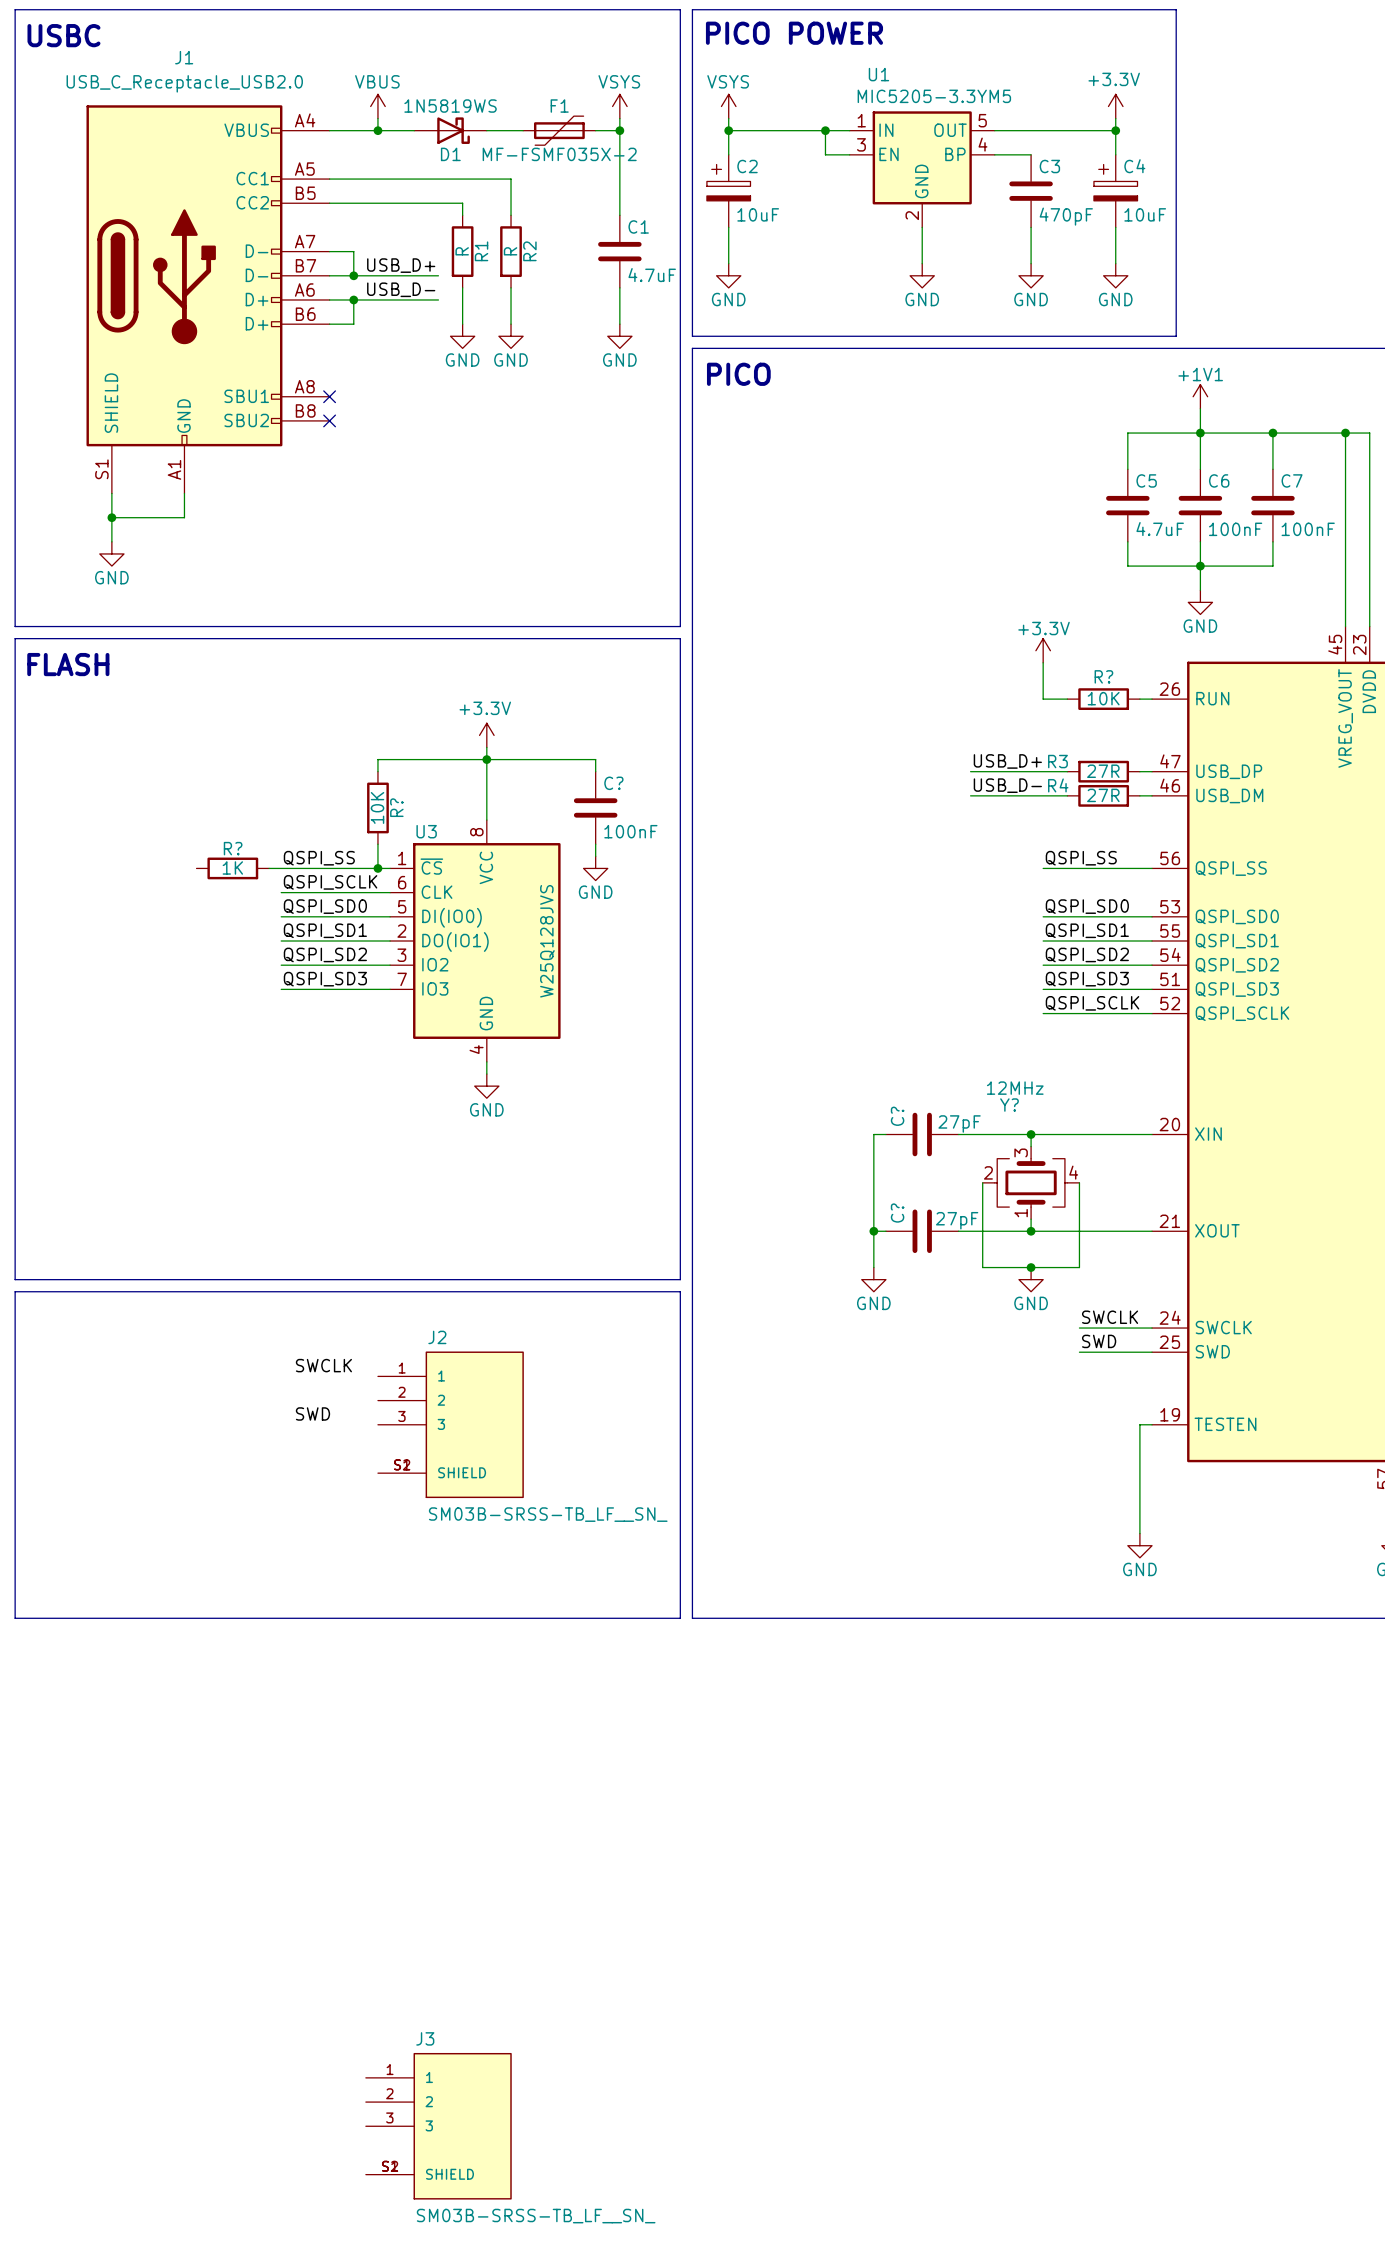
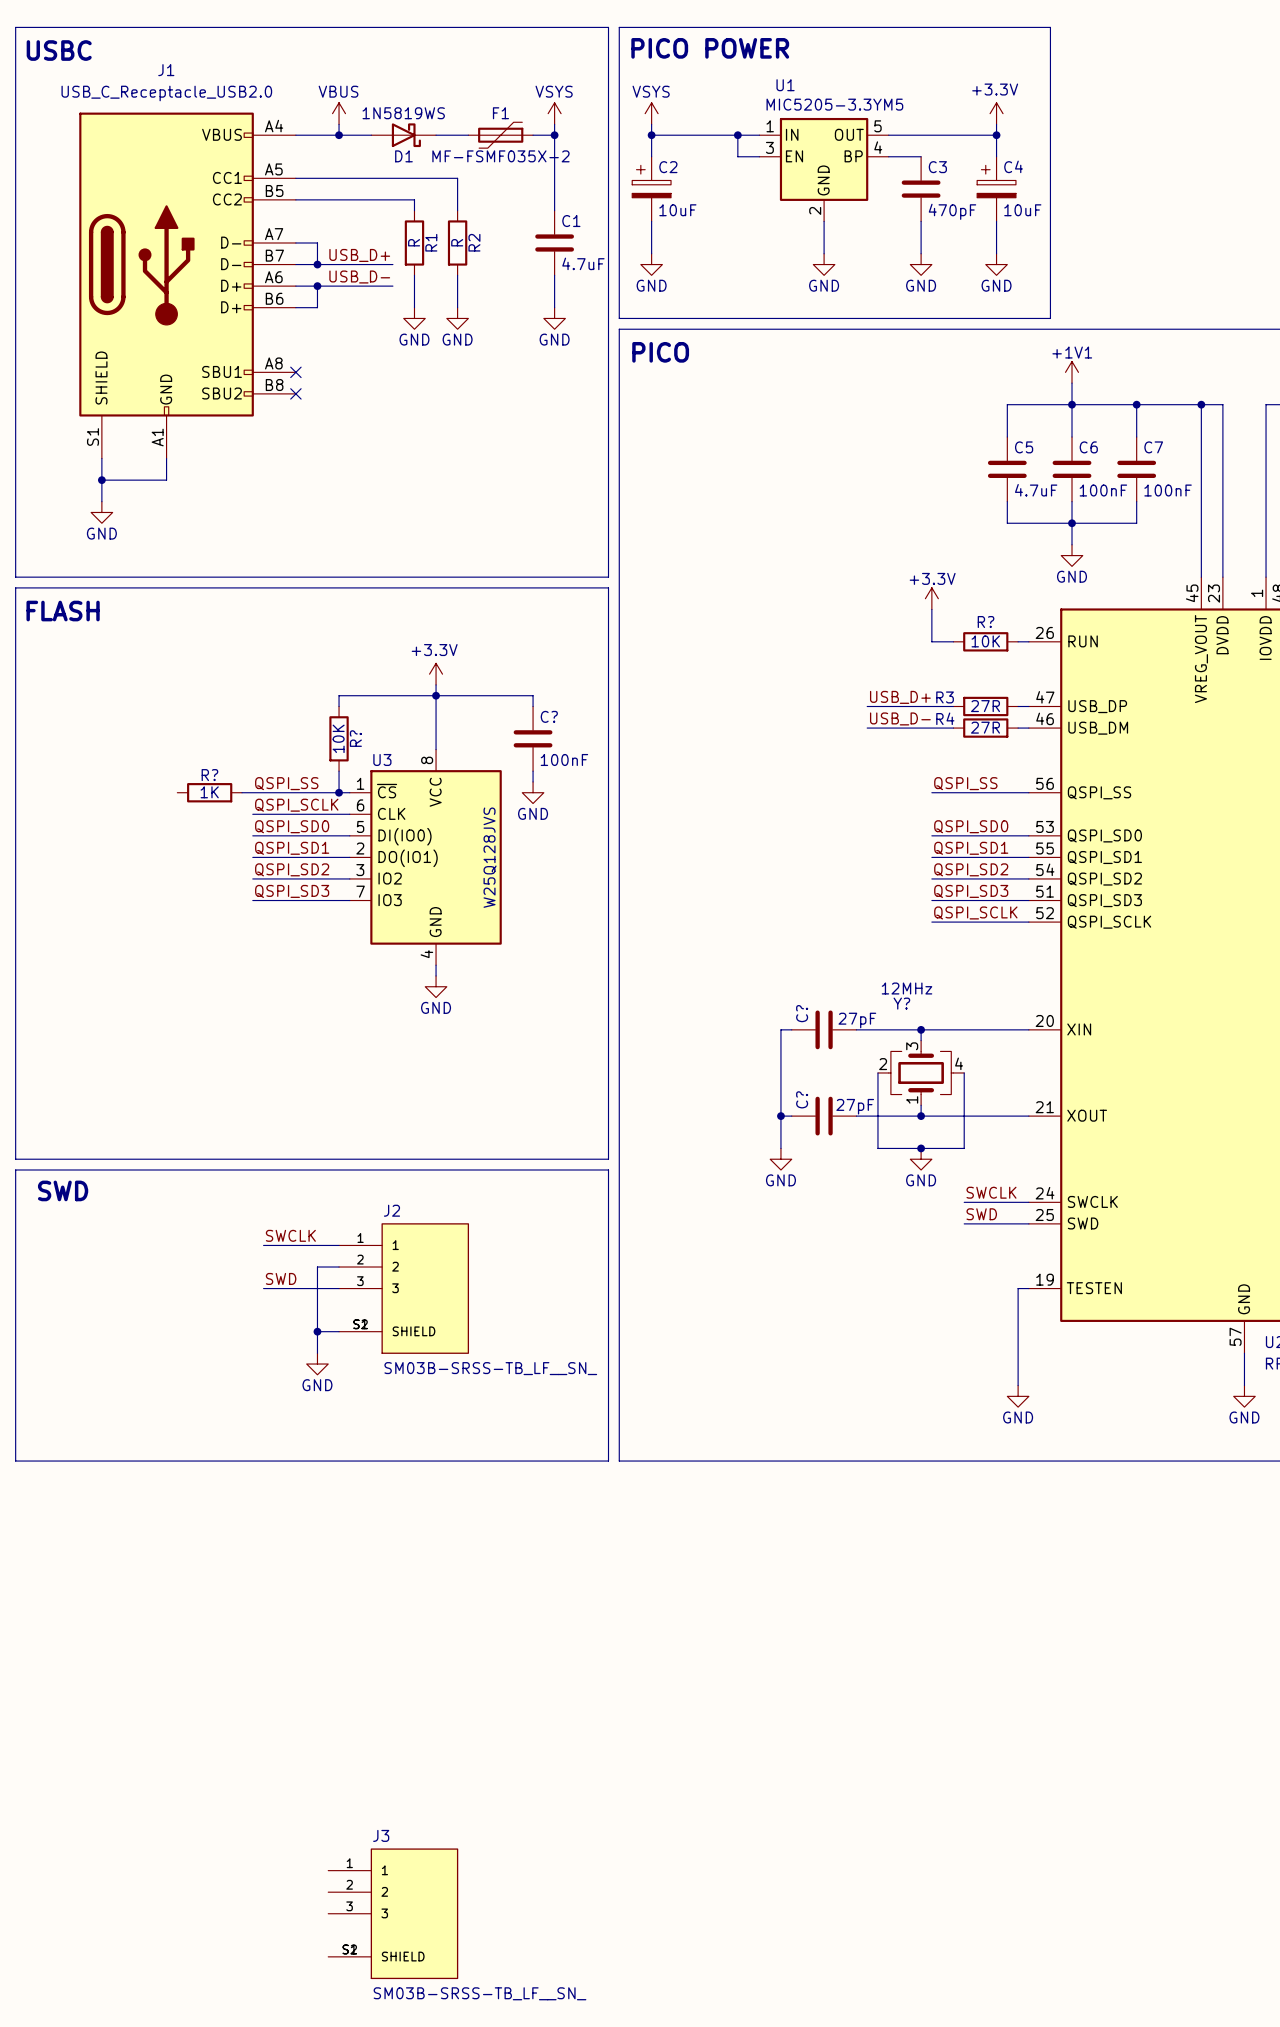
text: none -> SWD (63, 1190)
wire: none -> (263, 1245) (339, 1245)
wire: none -> (339, 1267) (317, 1267) (317, 1353)
wire: none -> (263, 1288) (339, 1288)
wire: none -> (317, 1331) (339, 1331)
junction: none -> (317, 1331)
power symbol: none -> GND (317, 1364)

